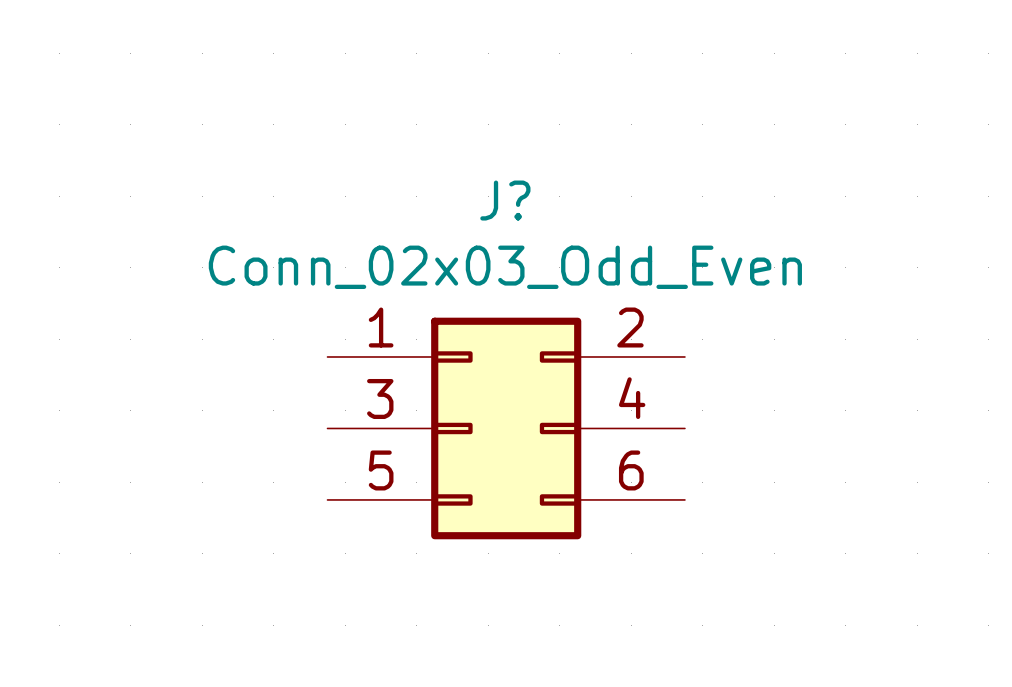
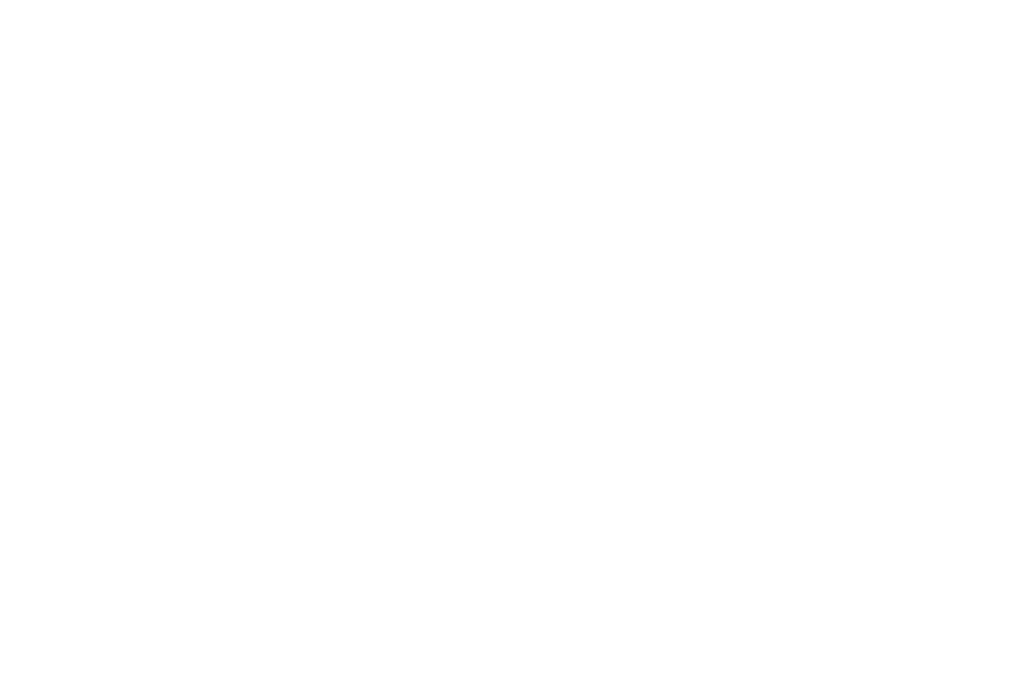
J?: Conn_02x03_Odd_Even (506, 428) -> none

